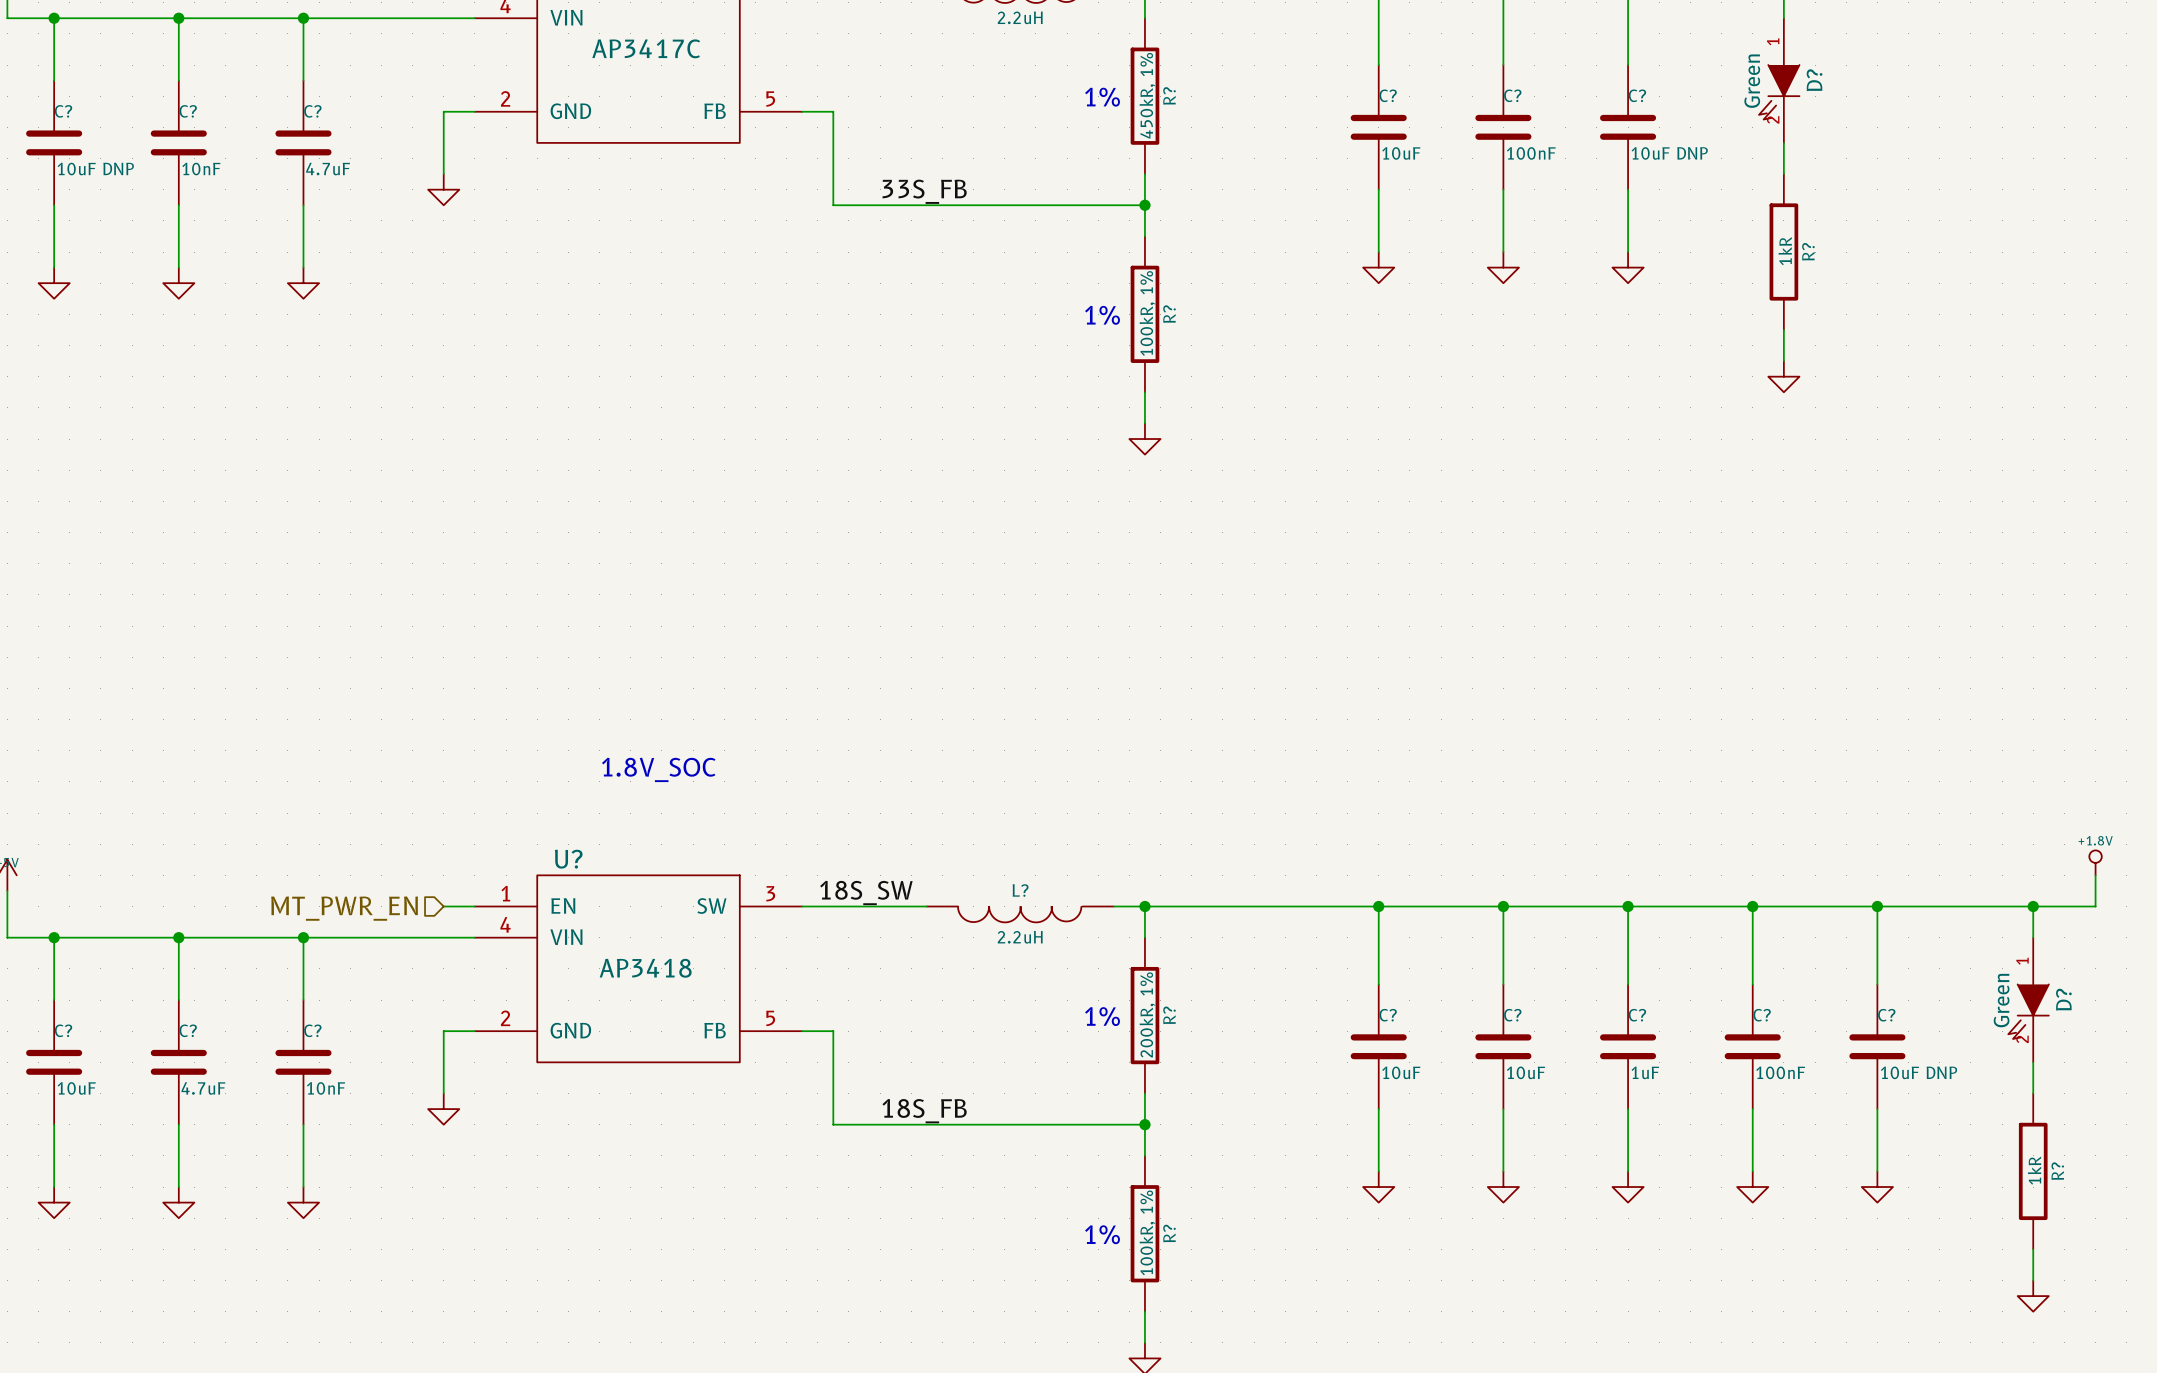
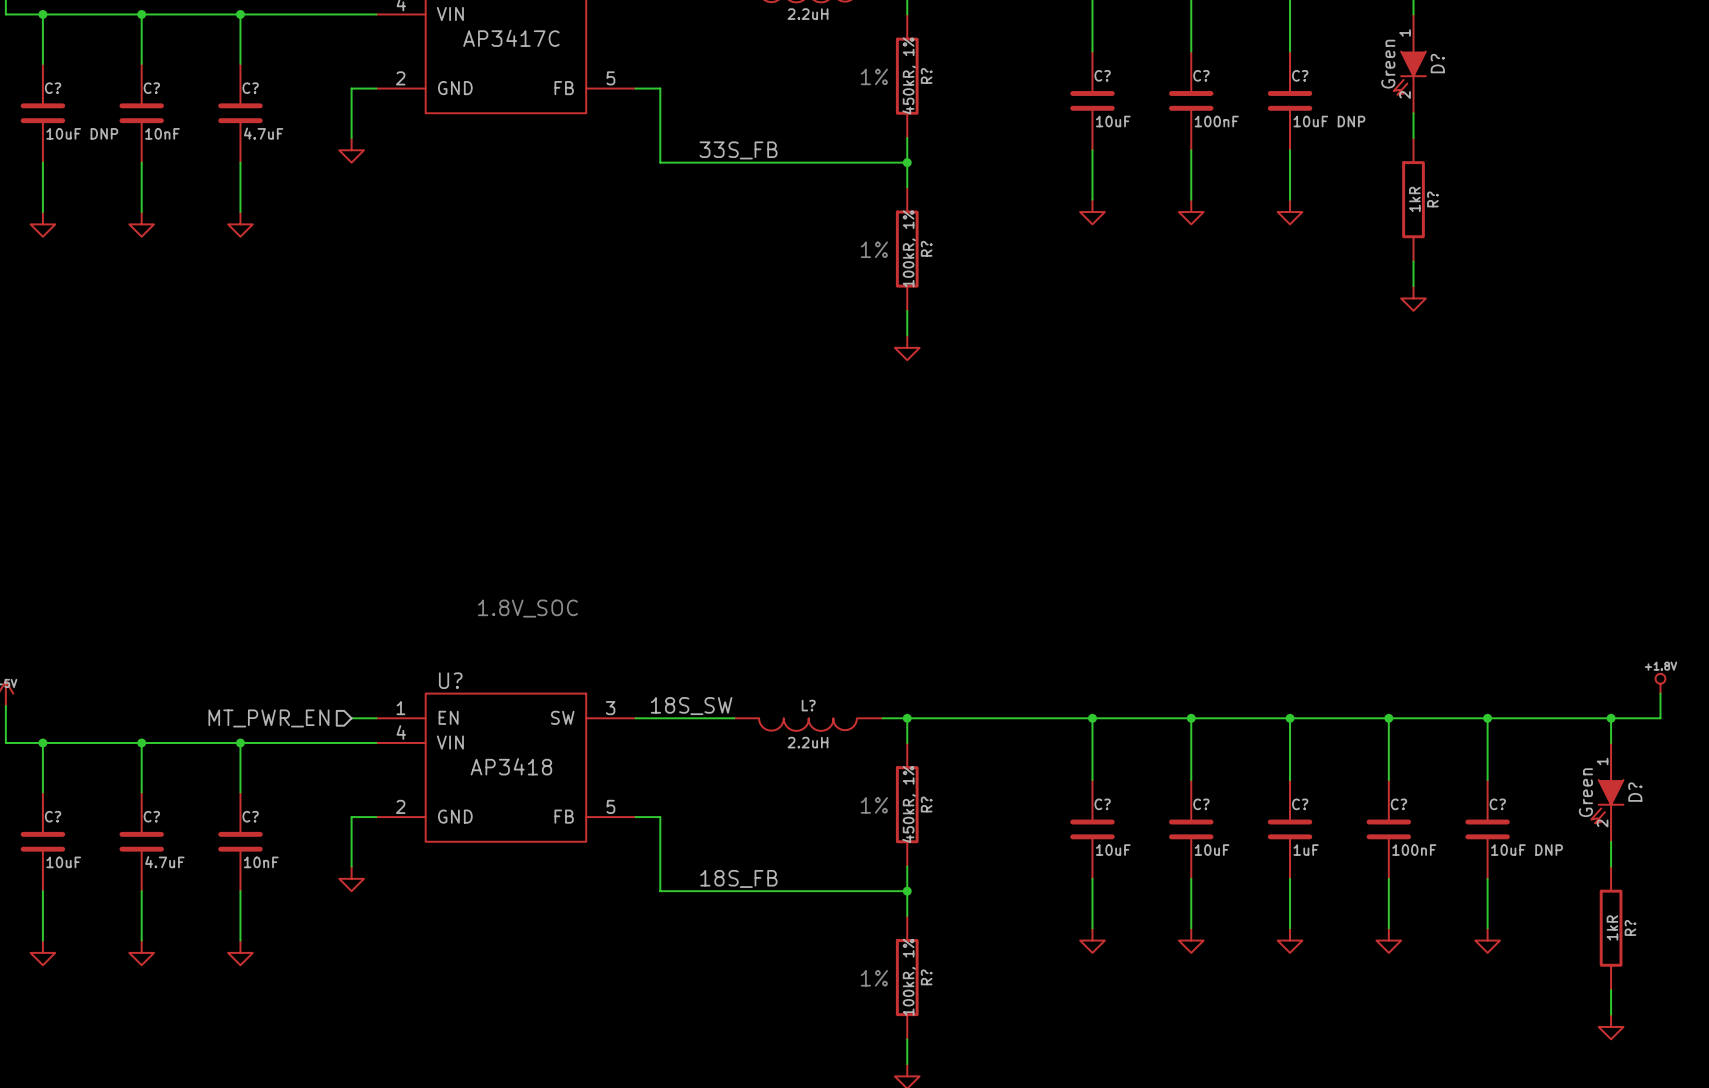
R? value: 200kR, 1% (1147, 1014) -> 450kR, 1% (909, 804)

